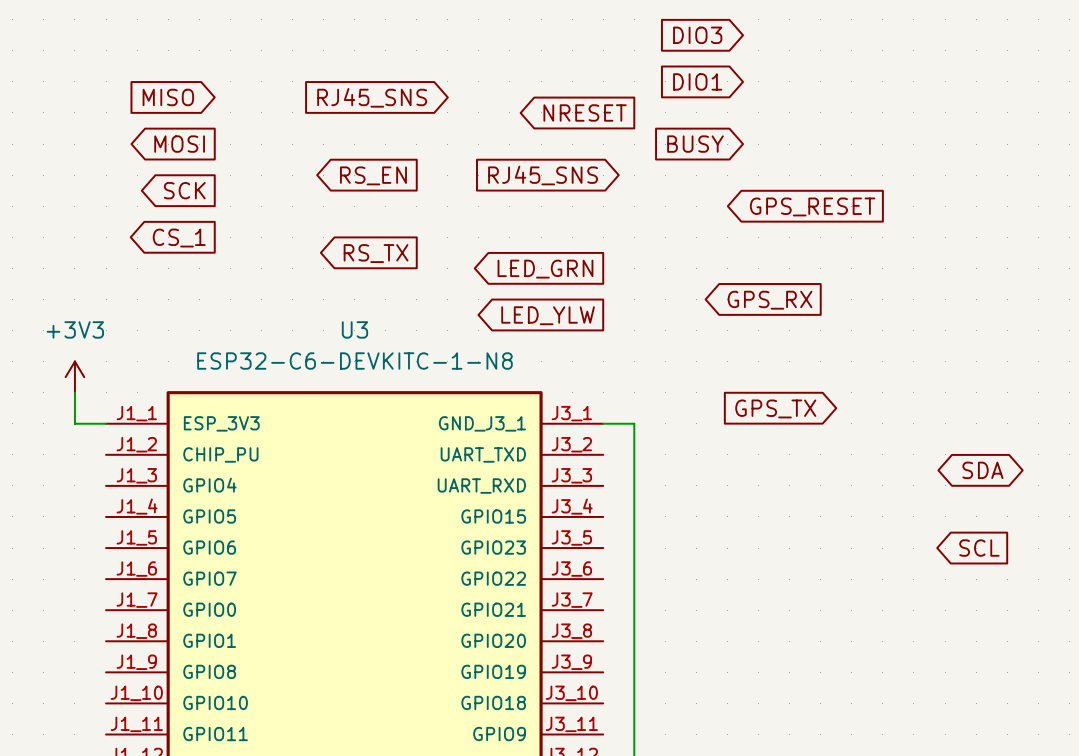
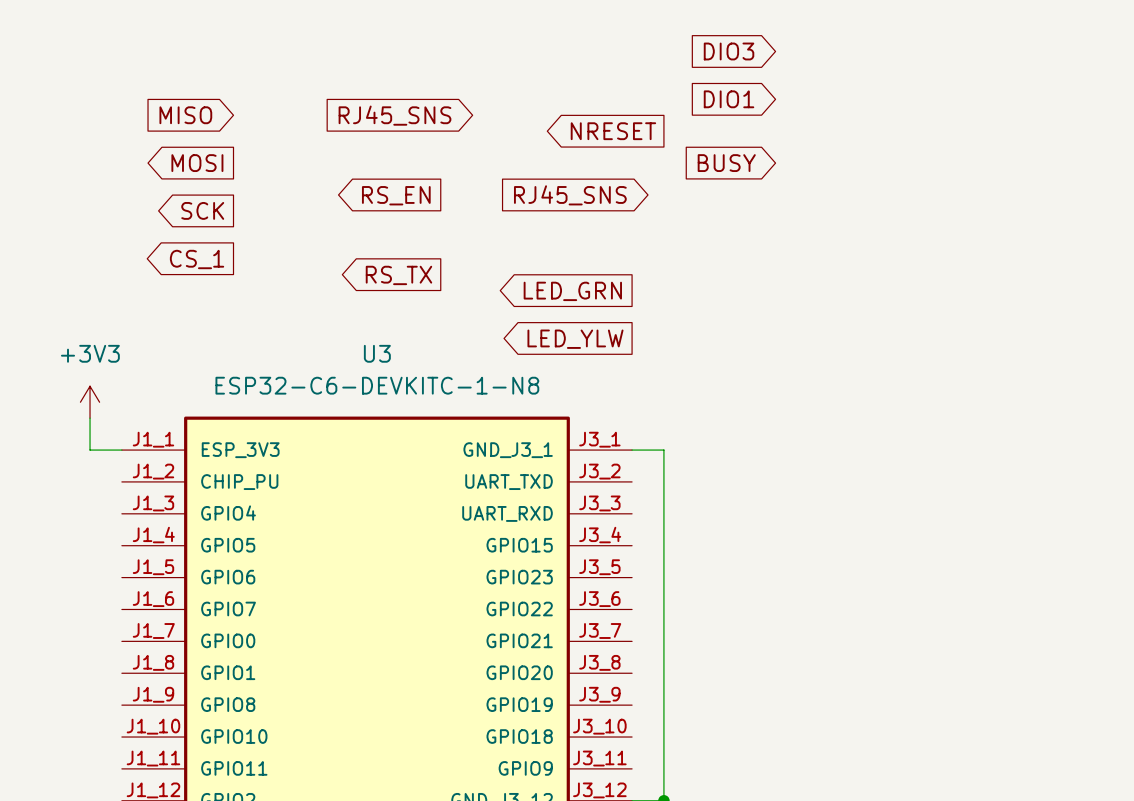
global label: GPS_RESET (812, 206) -> none
global label: GPS_RX (770, 300) -> none
global label: GPS_TX (775, 408) -> none
global label: SDA (982, 470) -> none
global label: SCL (979, 548) -> none

